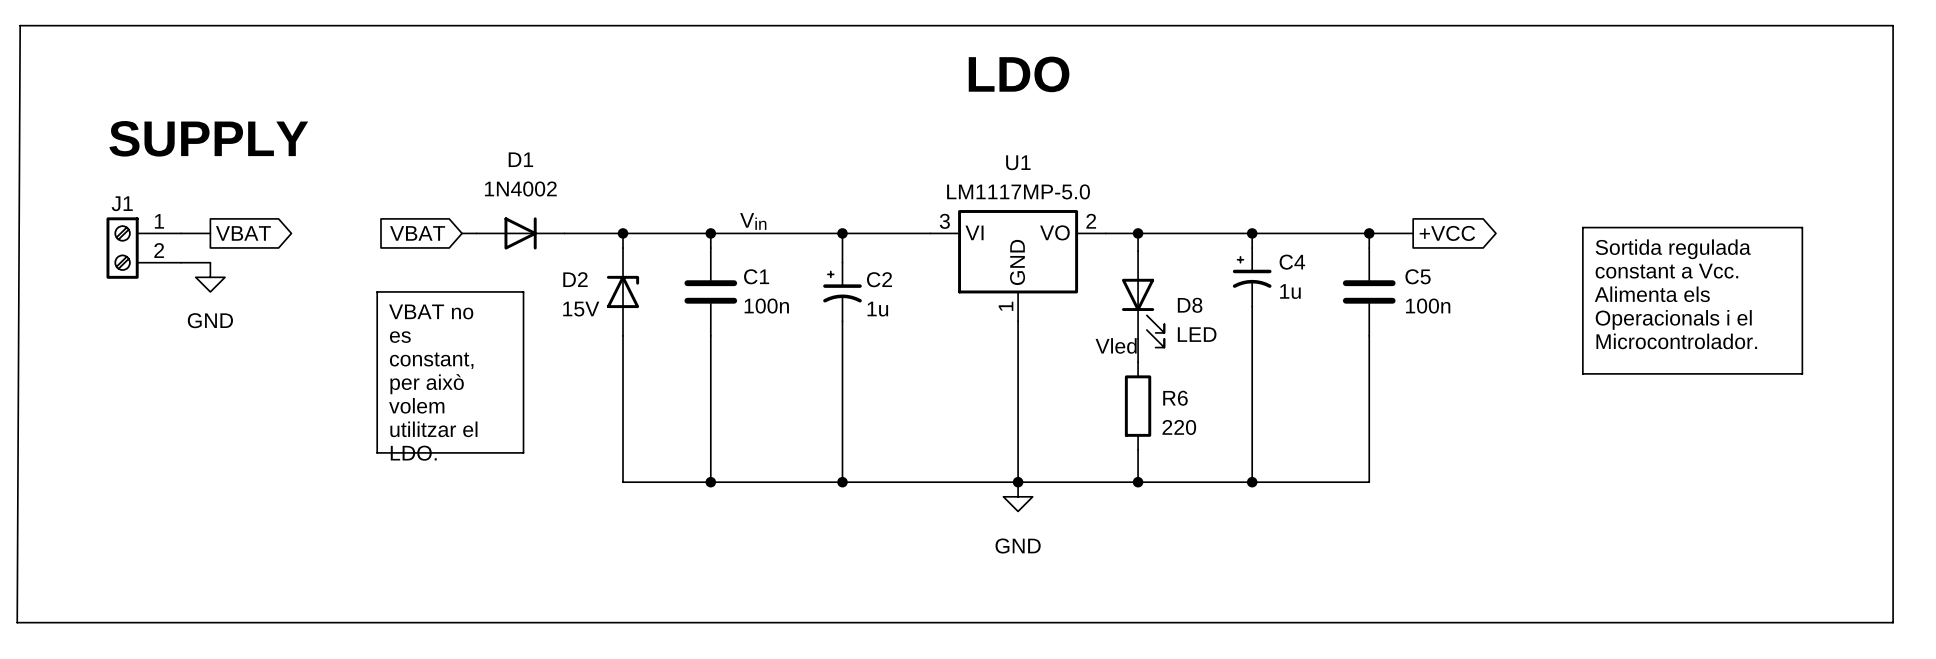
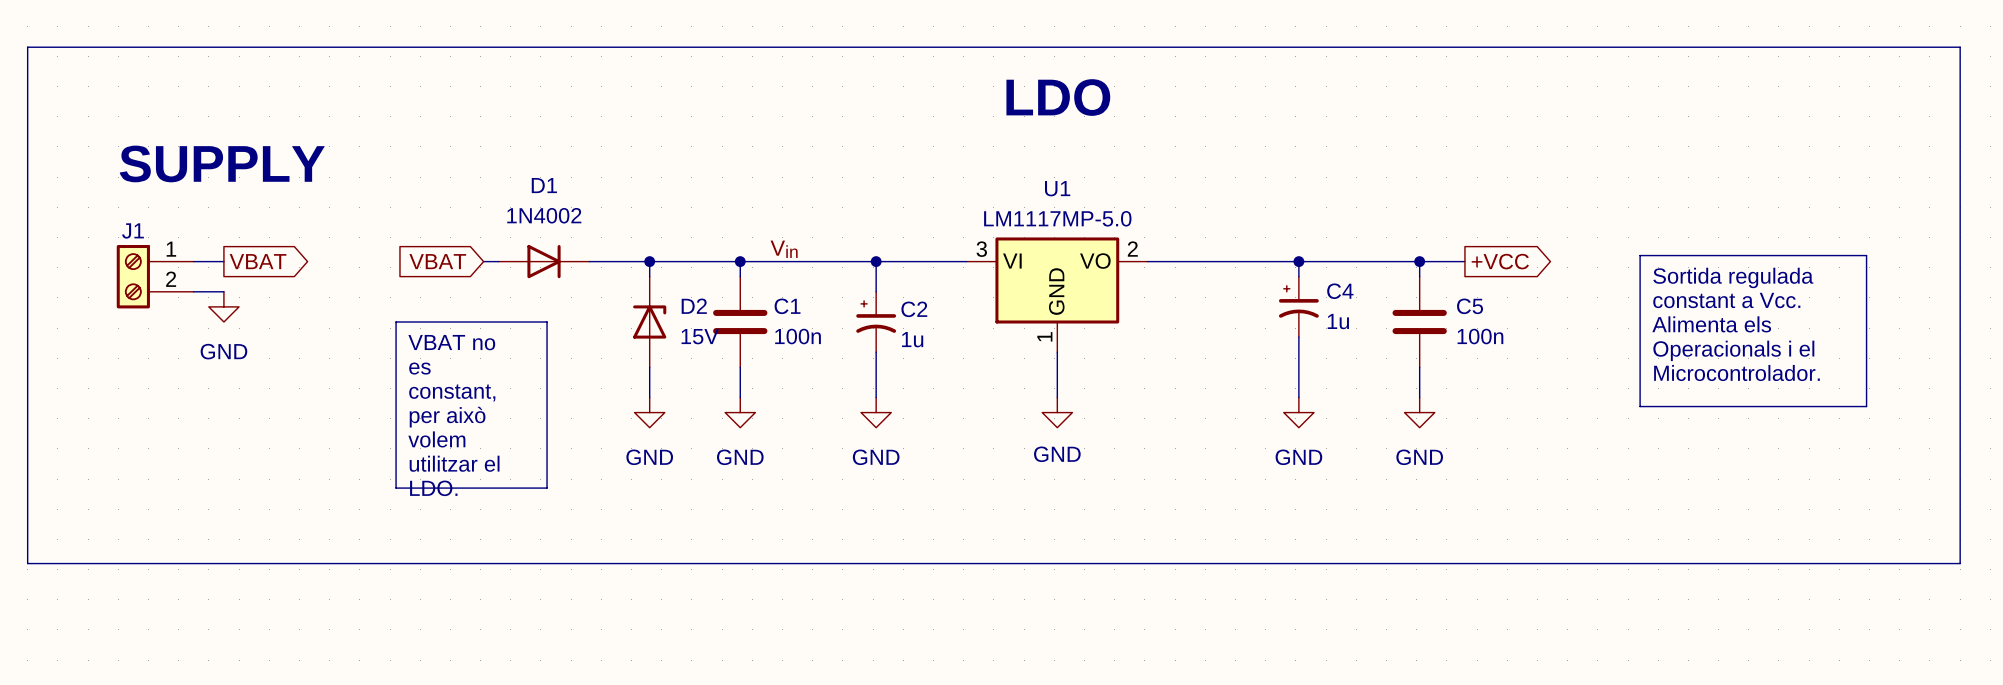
line: (20, 25) (17, 622) (1893, 622) (1893, 526) -> (27, 47) (27, 563) (1960, 563)
wire: (1138, 233) (1138, 250) -> none
junction: (1138, 233) -> none
D2 name position: D2 (575, 279) -> D2 (694, 306)
D8: LED (1143, 299) -> none
D2 value position: 15V (581, 309) -> 15V (700, 336)
wire: (1138, 338) (1138, 362) -> none
label: Vled (1116, 345) -> none
wire: (623, 365) (623, 482) (1369, 482) (1369, 365) -> none
wire: (710, 365) (710, 482) -> none
wire: (842, 365) (842, 482) -> none
wire: (1018, 365) (1018, 482) -> none
wire: (1252, 365) (1252, 482) -> none
power symbol: none -> GND (649, 412)
power symbol: none -> GND (740, 412)
power symbol: none -> GND (876, 412)
power symbol: none -> GND (1057, 412)
power symbol: none -> GND (1298, 412)
power symbol: none -> GND (1419, 412)
R6: 220 (1138, 406) -> none
wire: (1138, 449) (1138, 482) -> none
junction: (710, 482) -> none
junction: (842, 482) -> none
junction: (1018, 482) -> none
junction: (1138, 482) -> none
junction: (1252, 482) -> none
power symbol: GND (1018, 496) -> none

